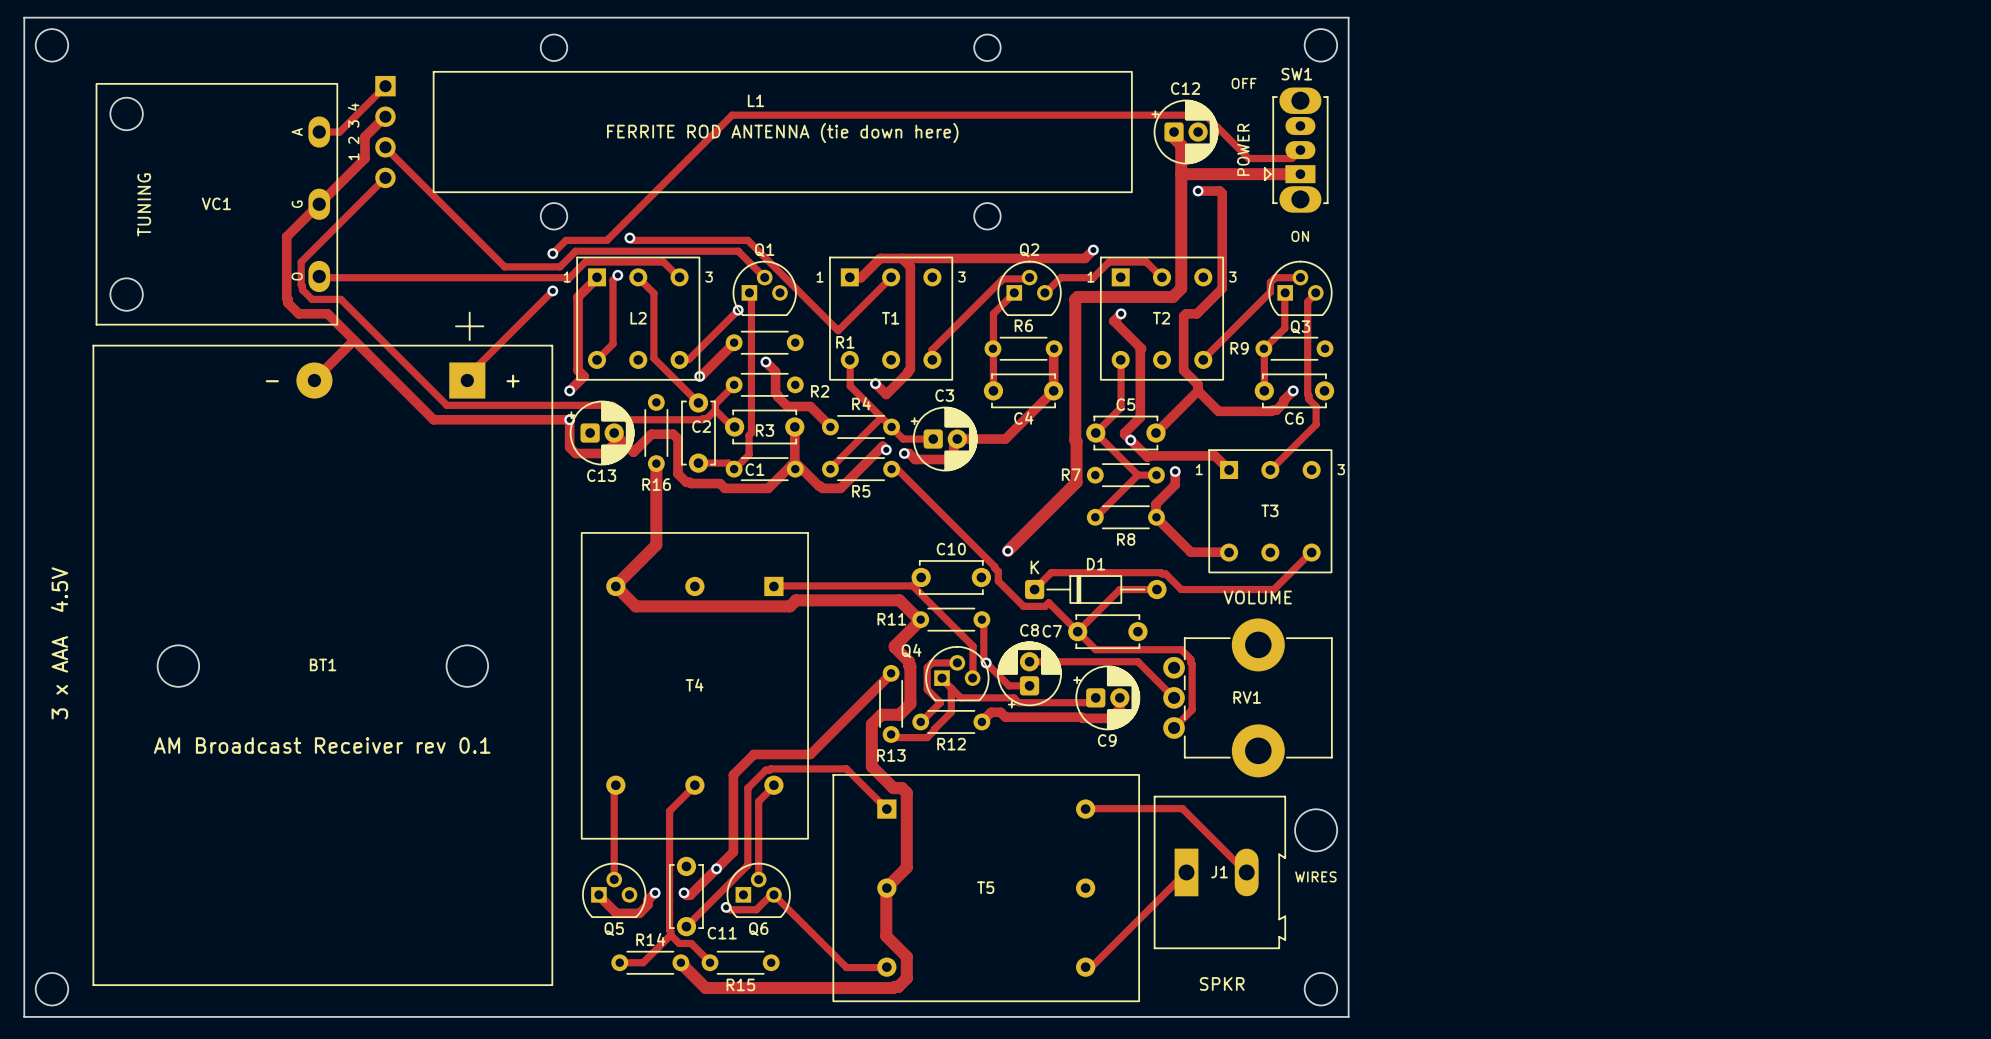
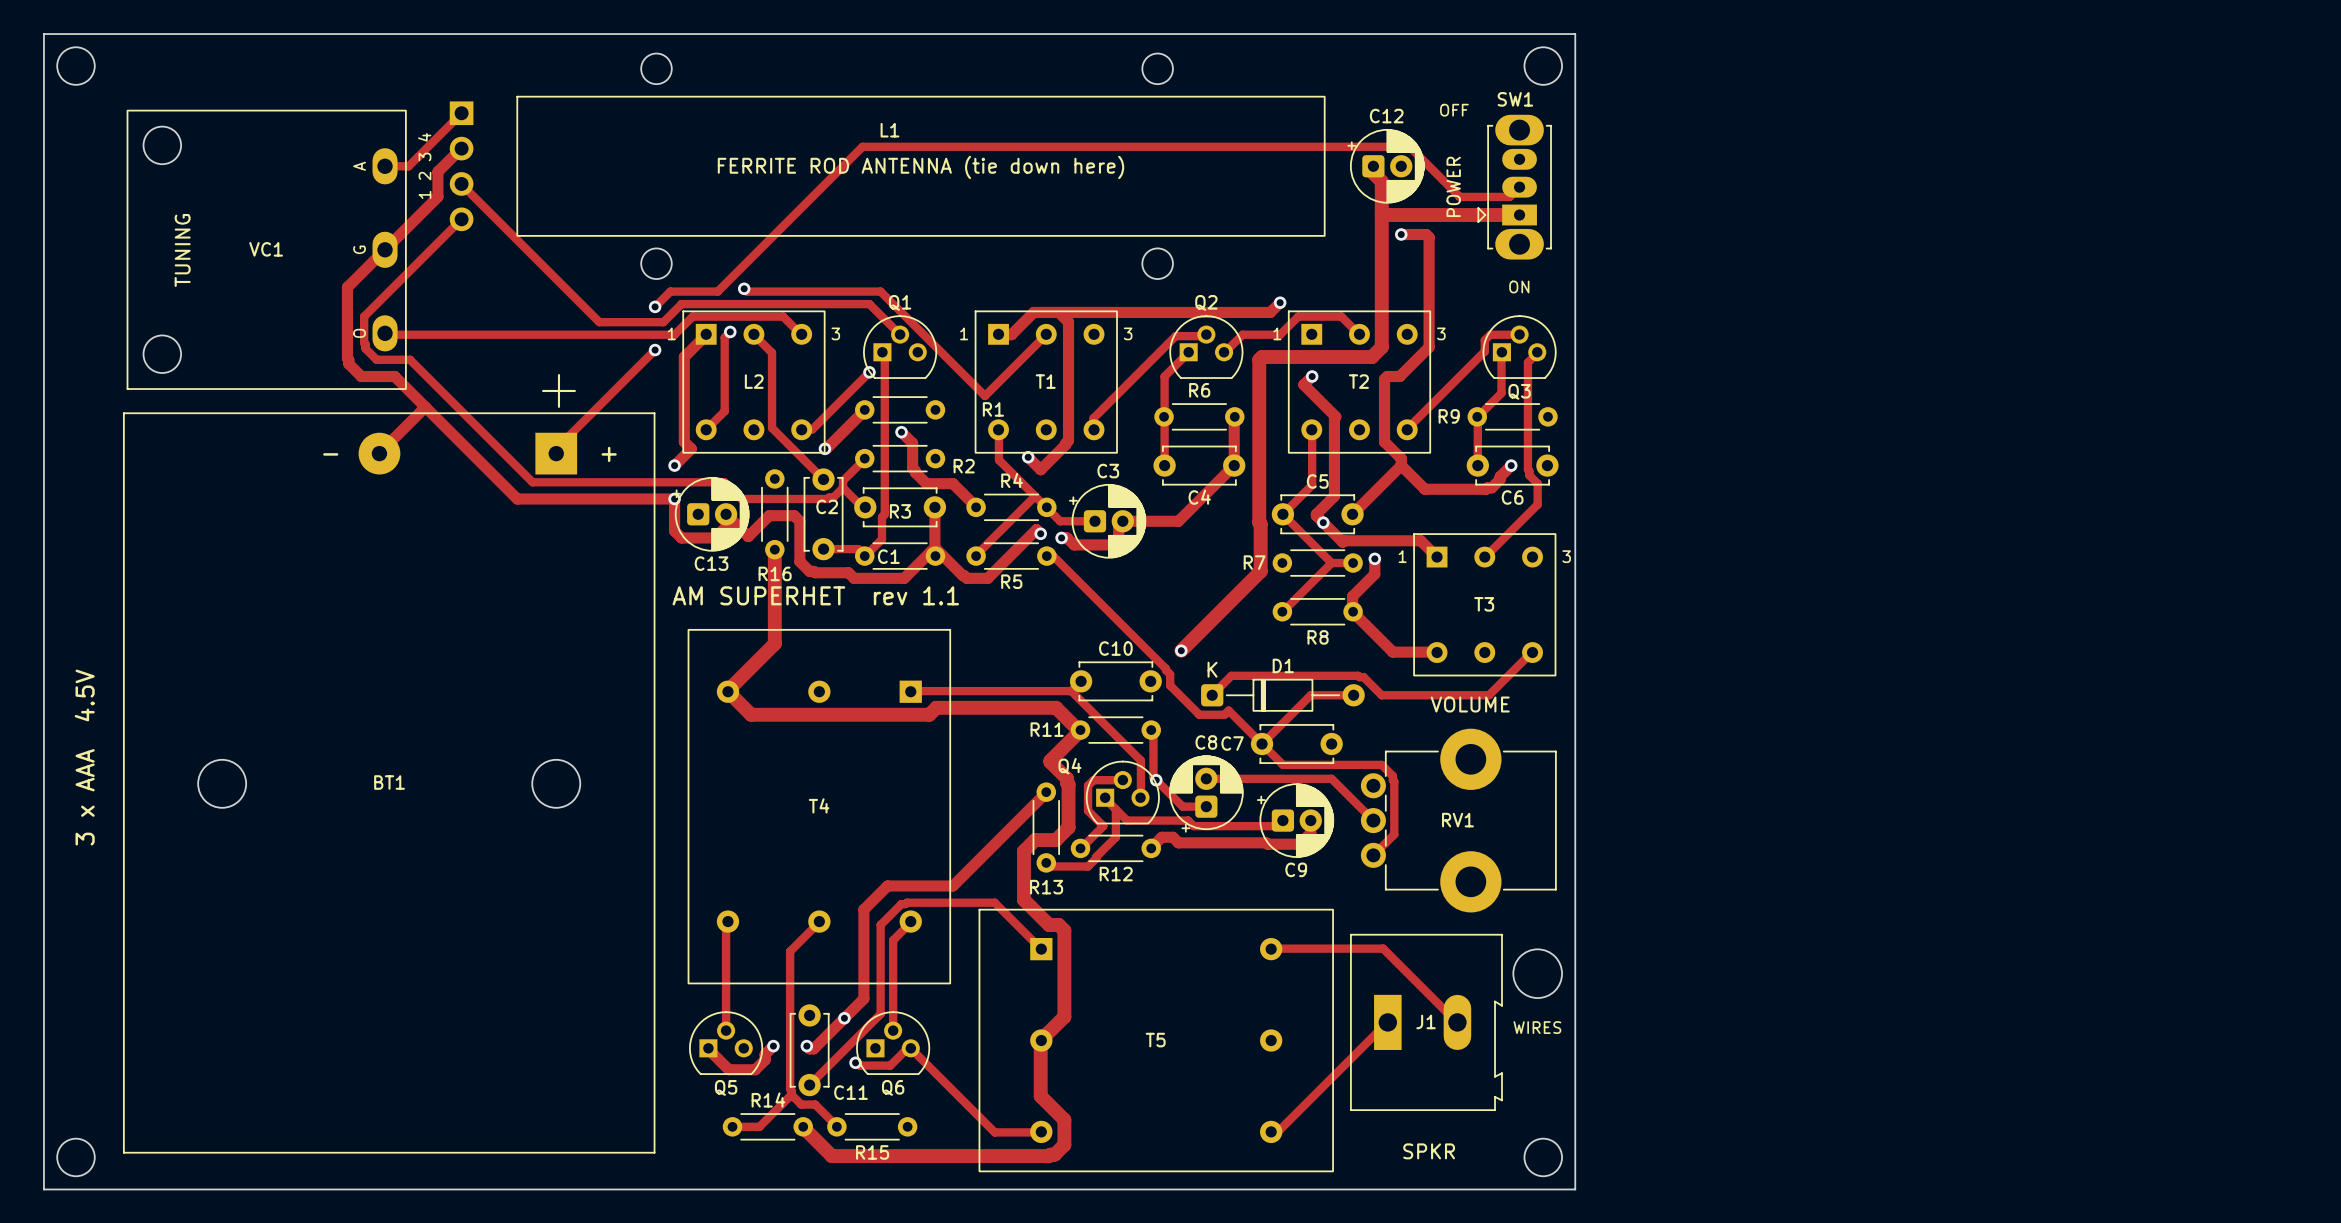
text: none -> AM SUPERHET rev 1.1 (815, 595)
text: AM Broadcast Receiver rev 0.1 (322, 745) -> none

